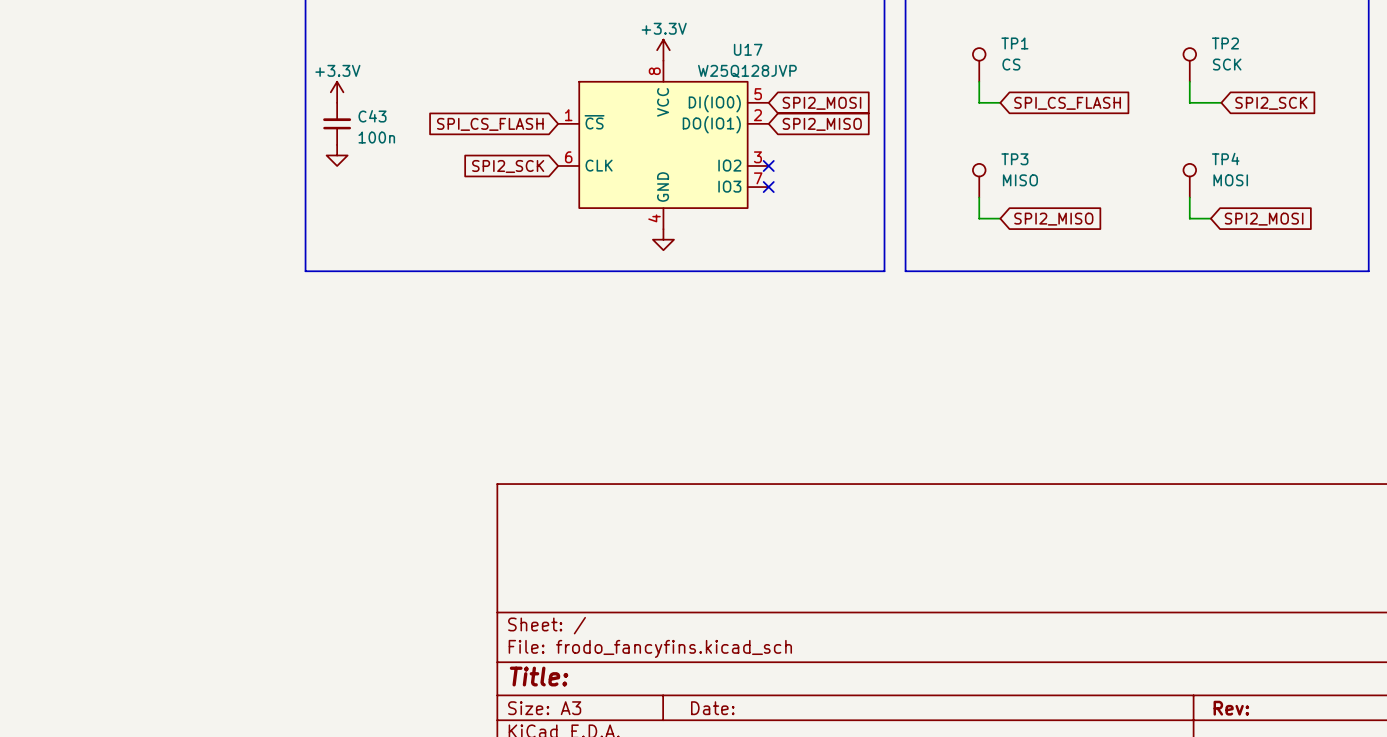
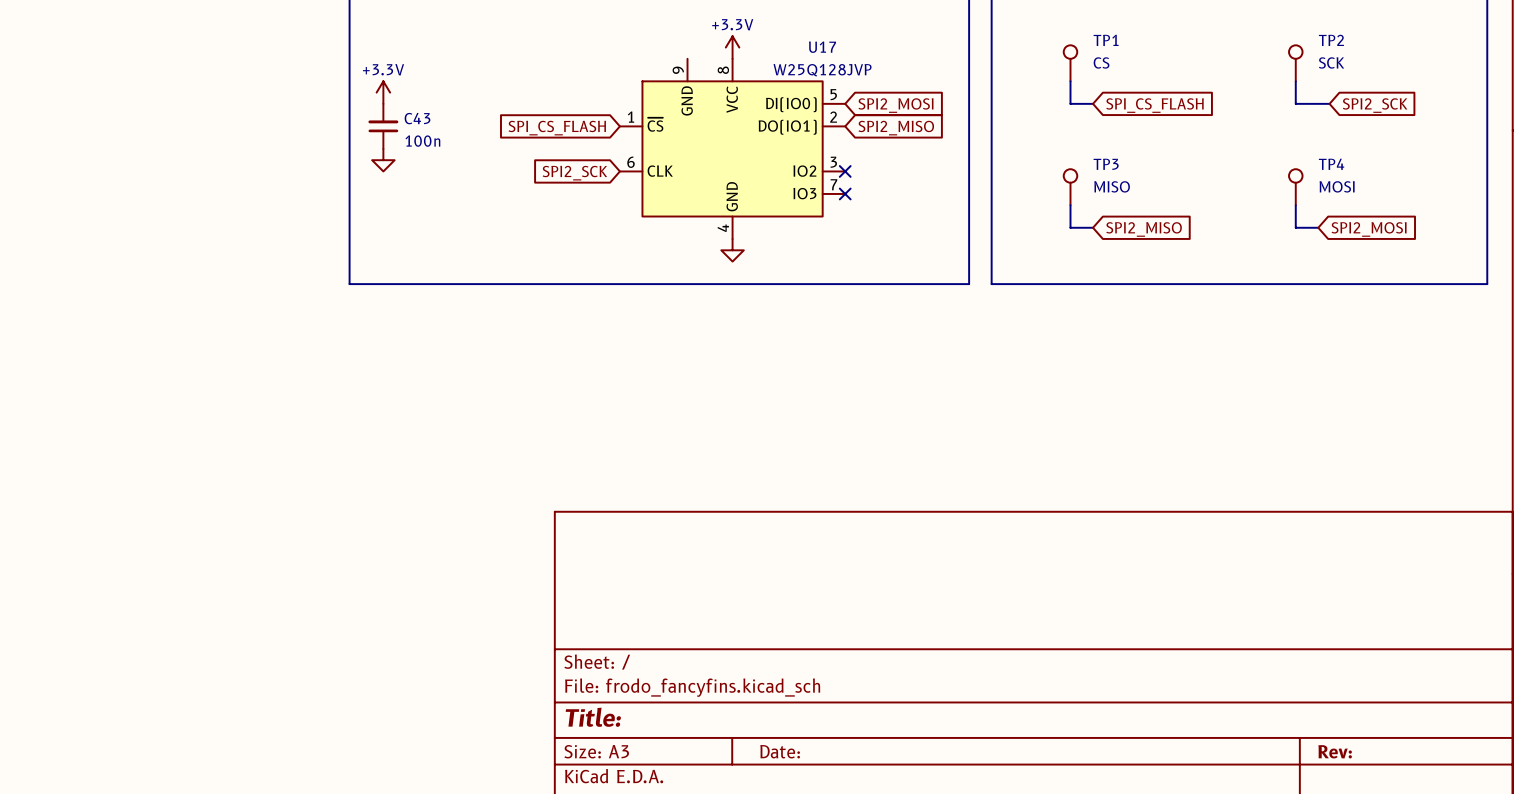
U17 symbol: [558, 60, 769, 230] -> [619, 58, 846, 240]

